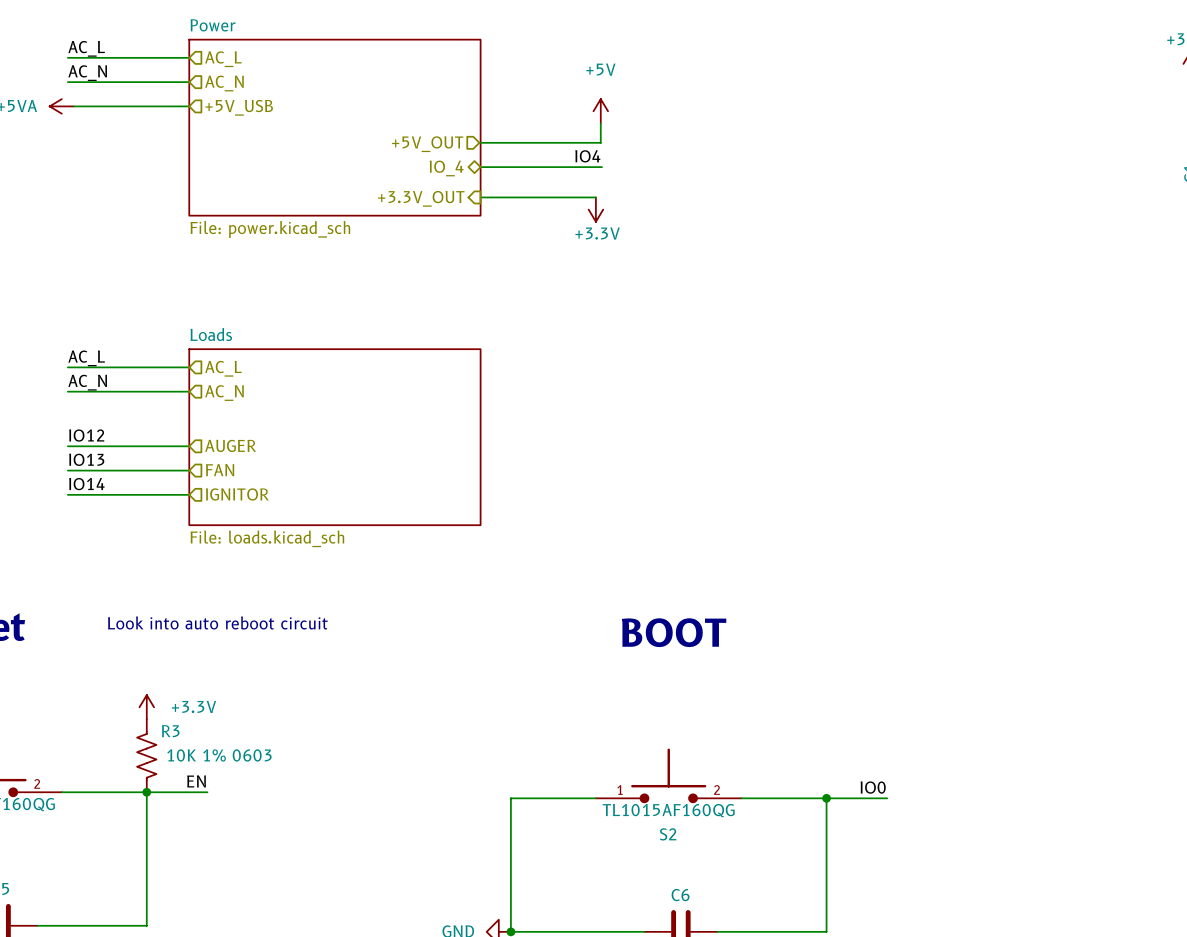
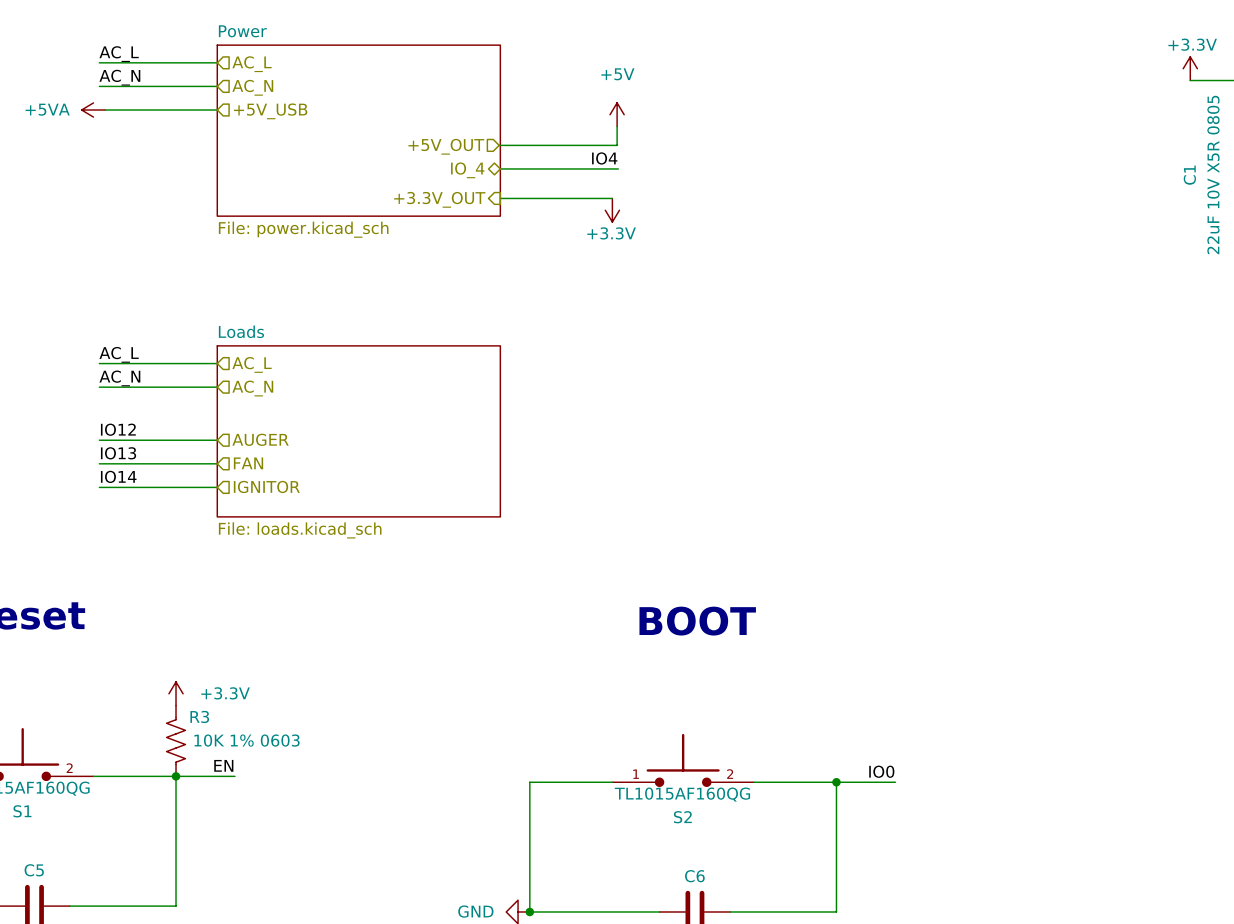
text: Look into auto reboot circuit (217, 622) -> none

